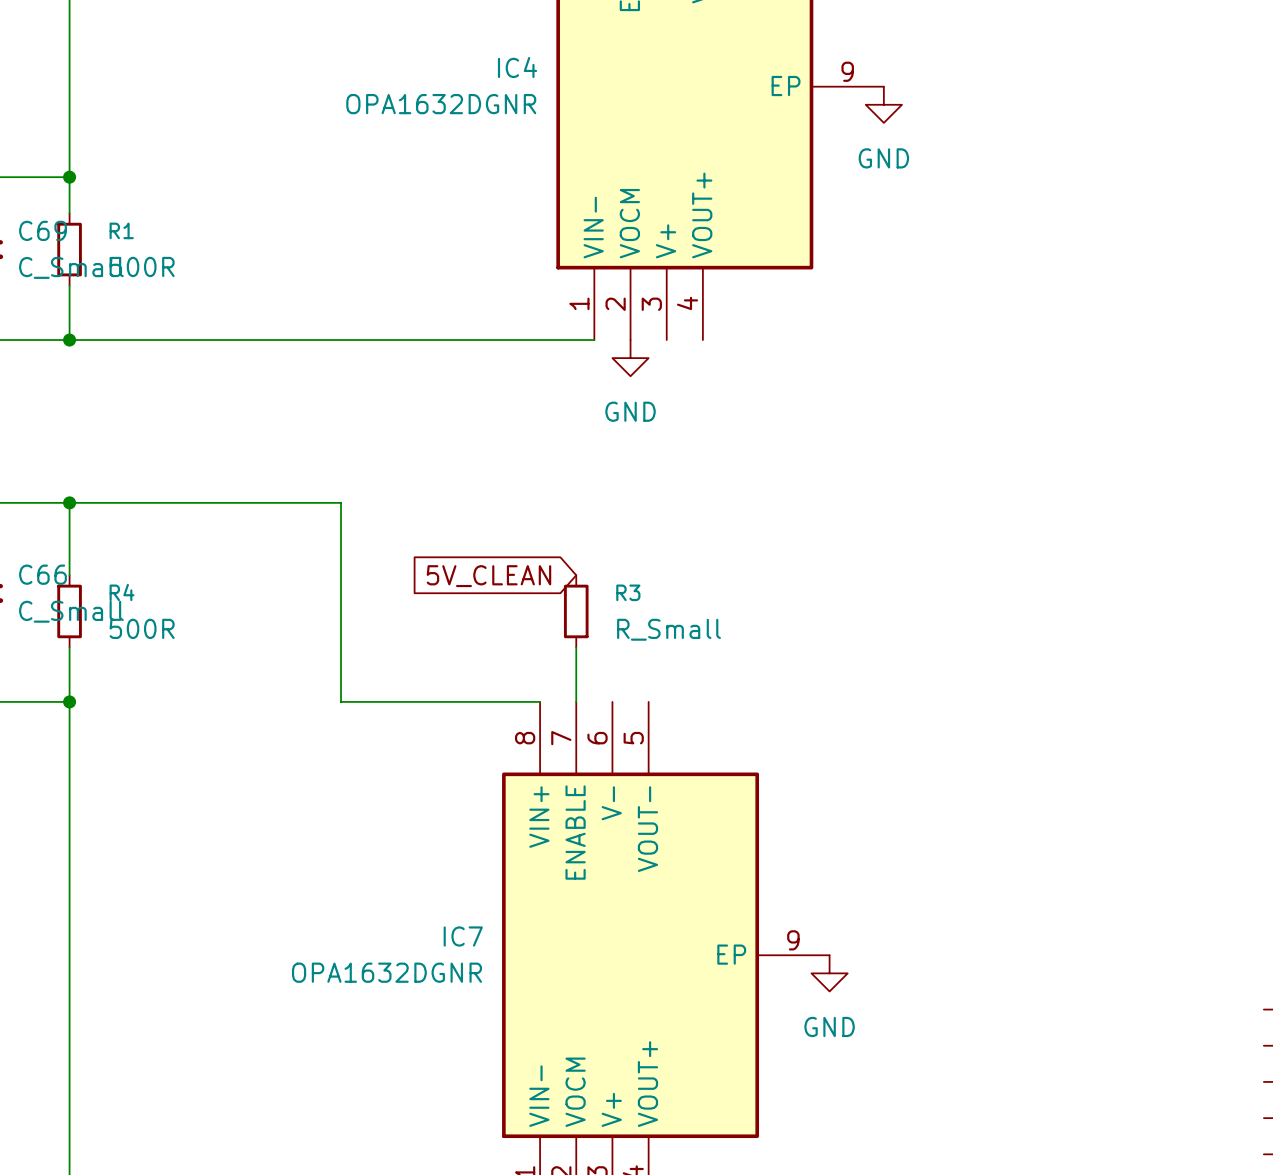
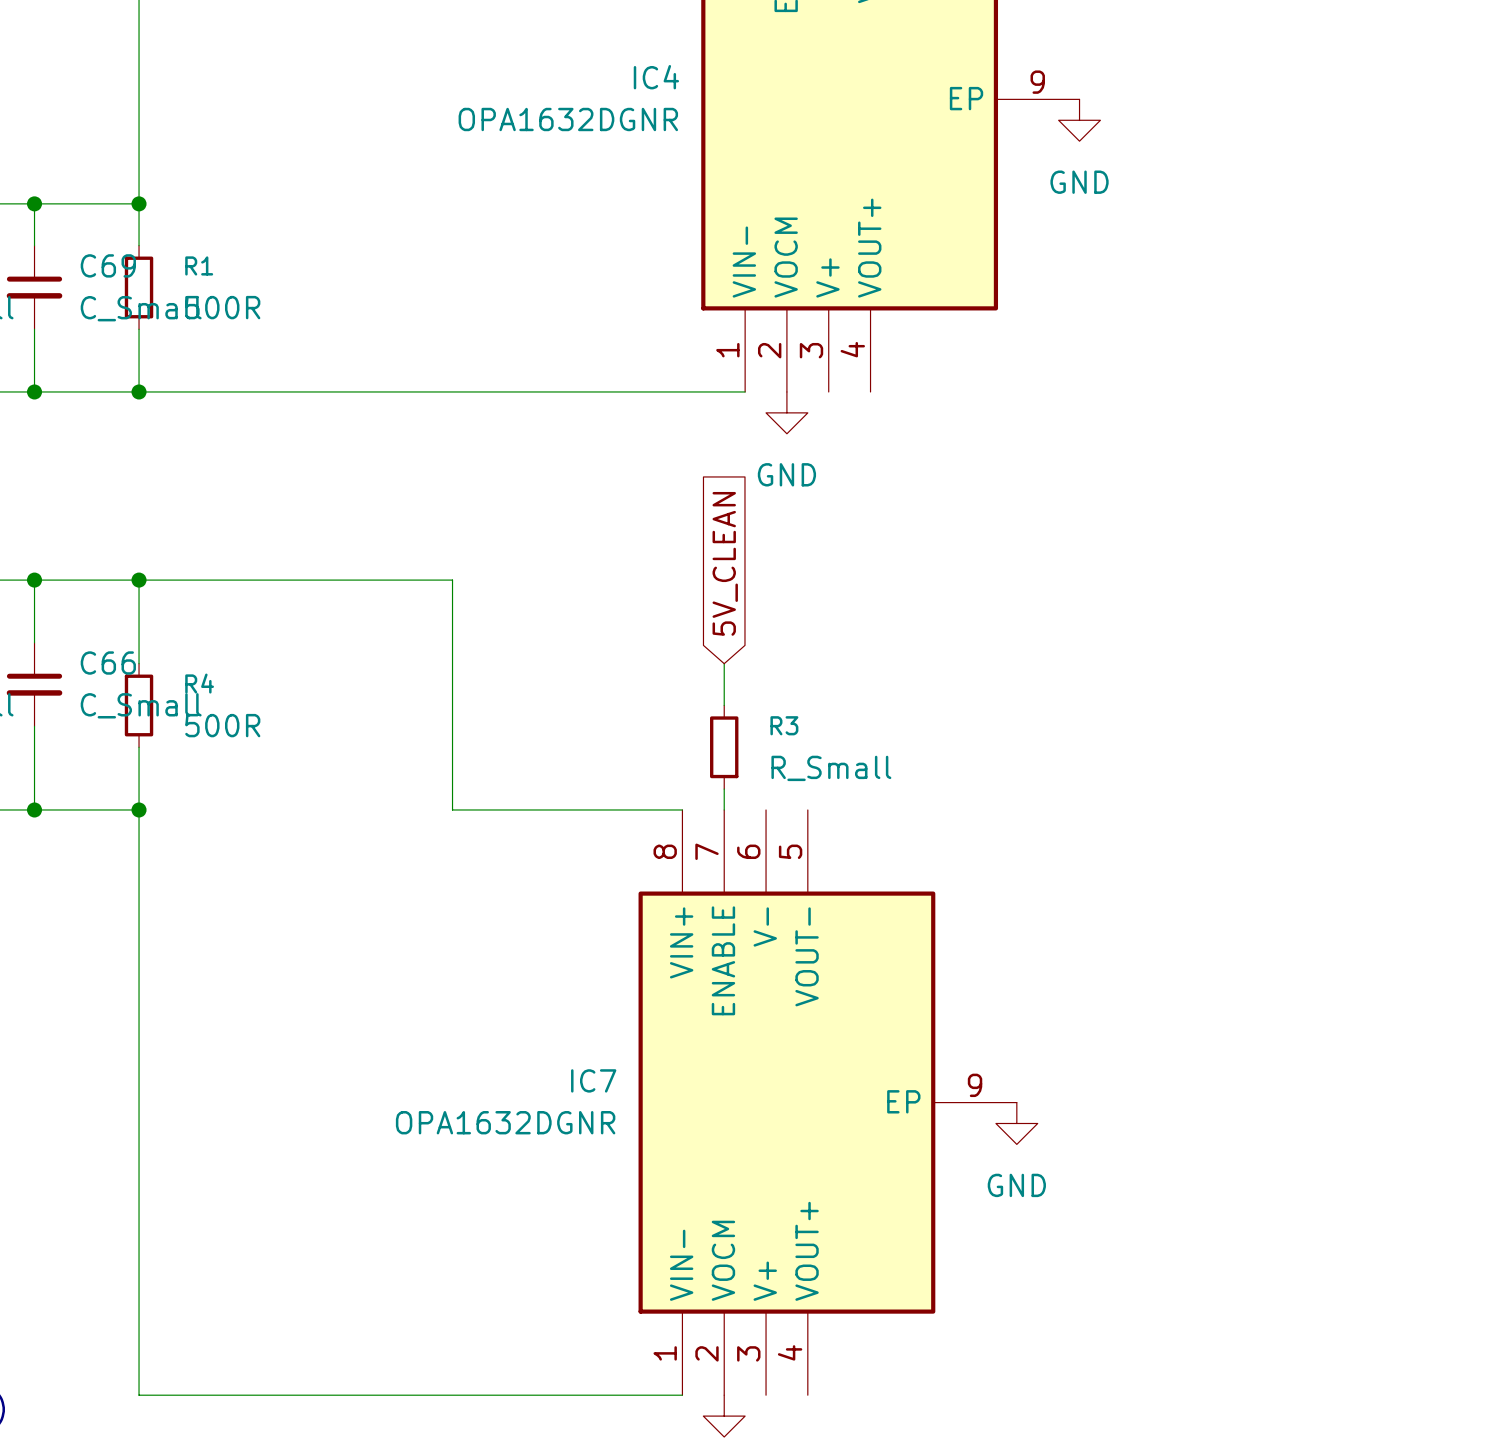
global label rotation: 0° (488, 576) -> 90° clockwise (725, 563)
R3 position: (576, 611) -> (724, 747)
wire: (576, 647) (576, 683) -> (724, 663) (724, 705)

